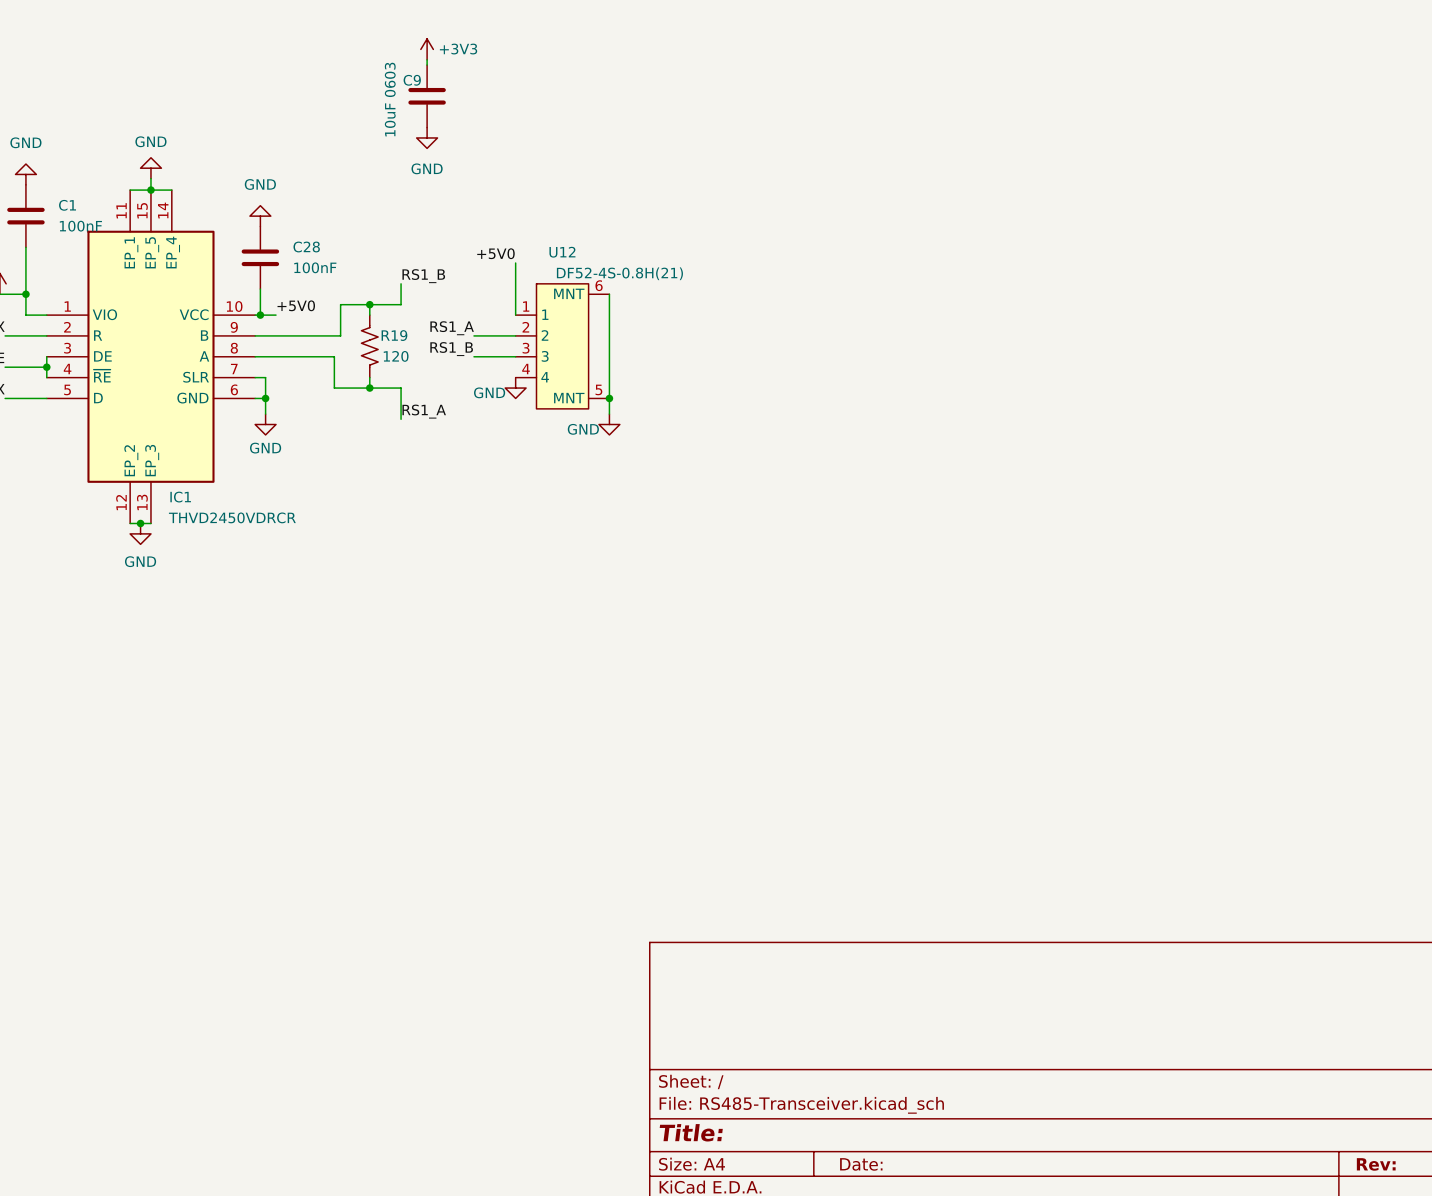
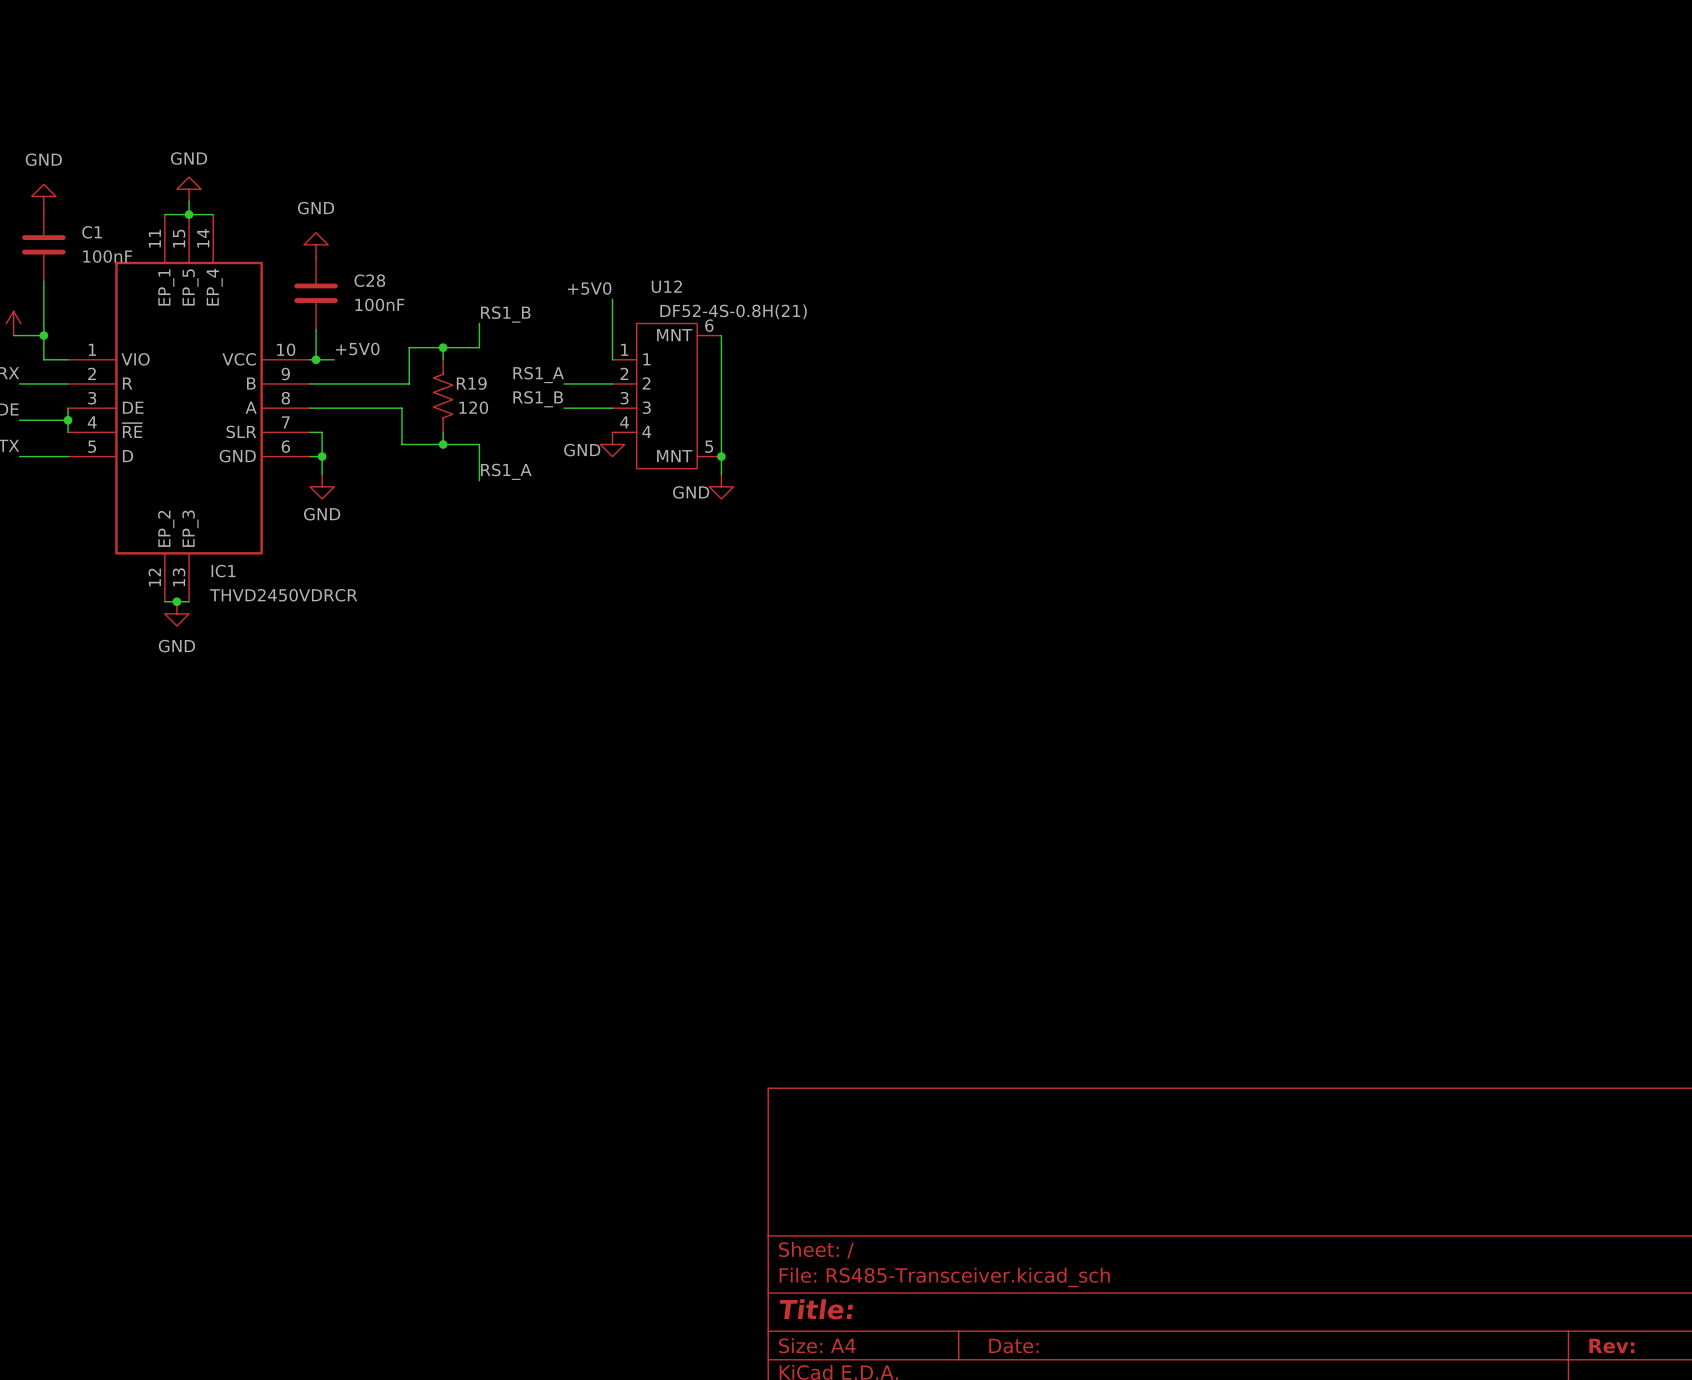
power symbol: +3V3 (427, 49) -> none
wire: (427, 59) (427, 65) -> none
C9: 10uF 0603 (427, 96) -> none
power symbol: GND (427, 137) -> none

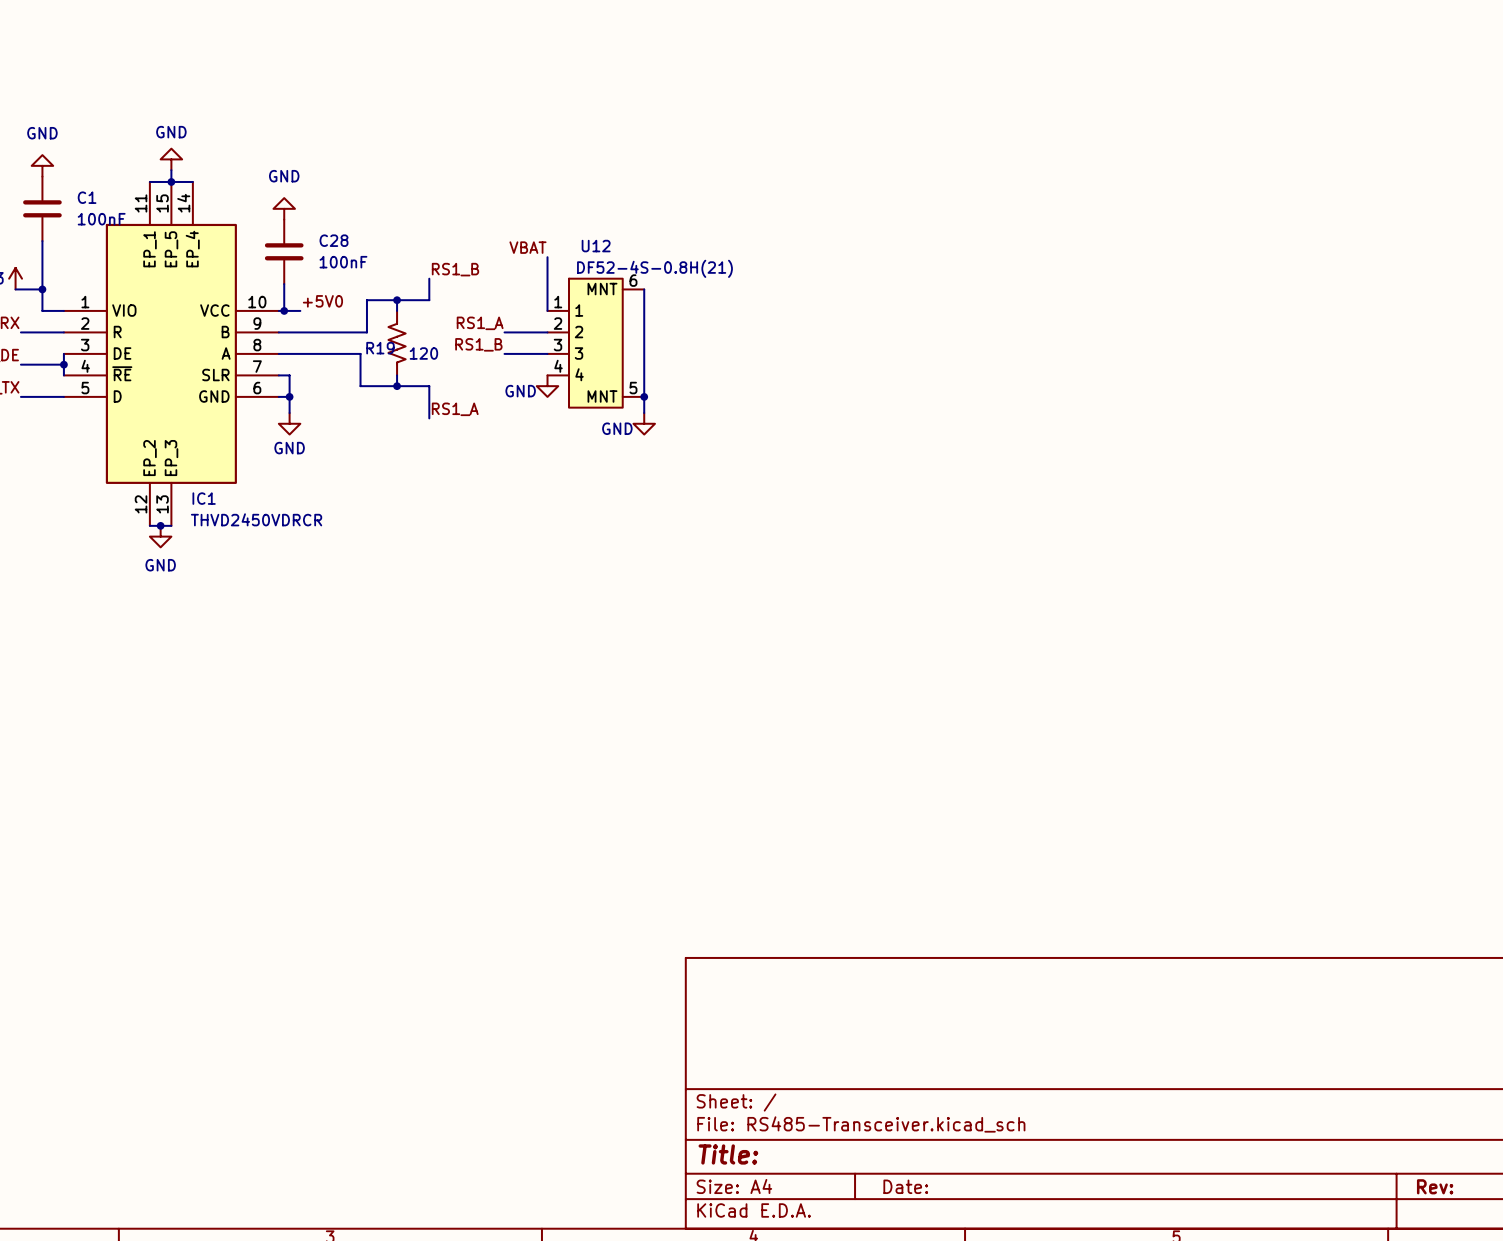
label: +5V0 (589, 288) -> VBAT (527, 247)
R19 name position: R19 (471, 383) -> R19 (380, 348)

